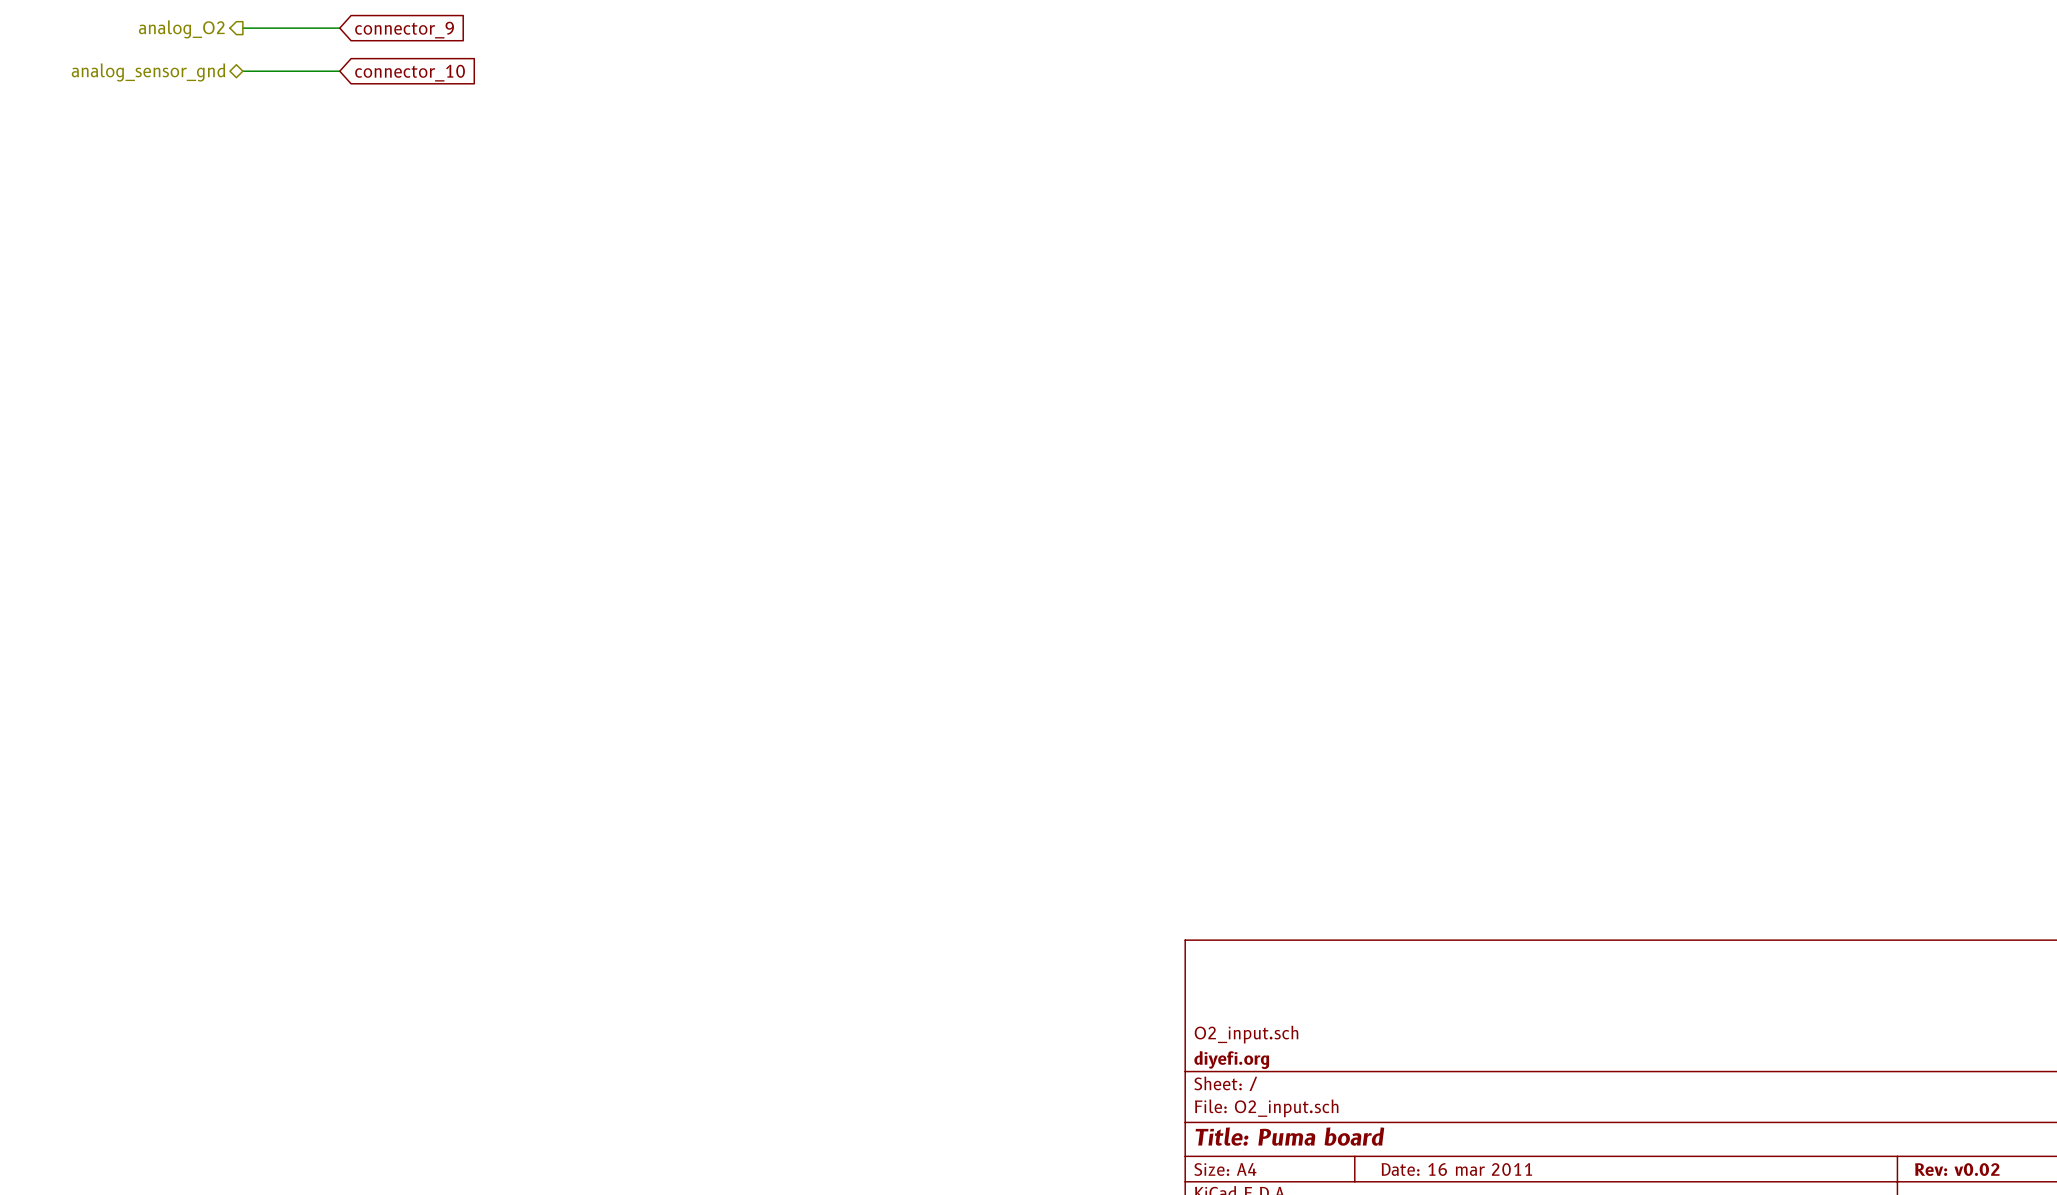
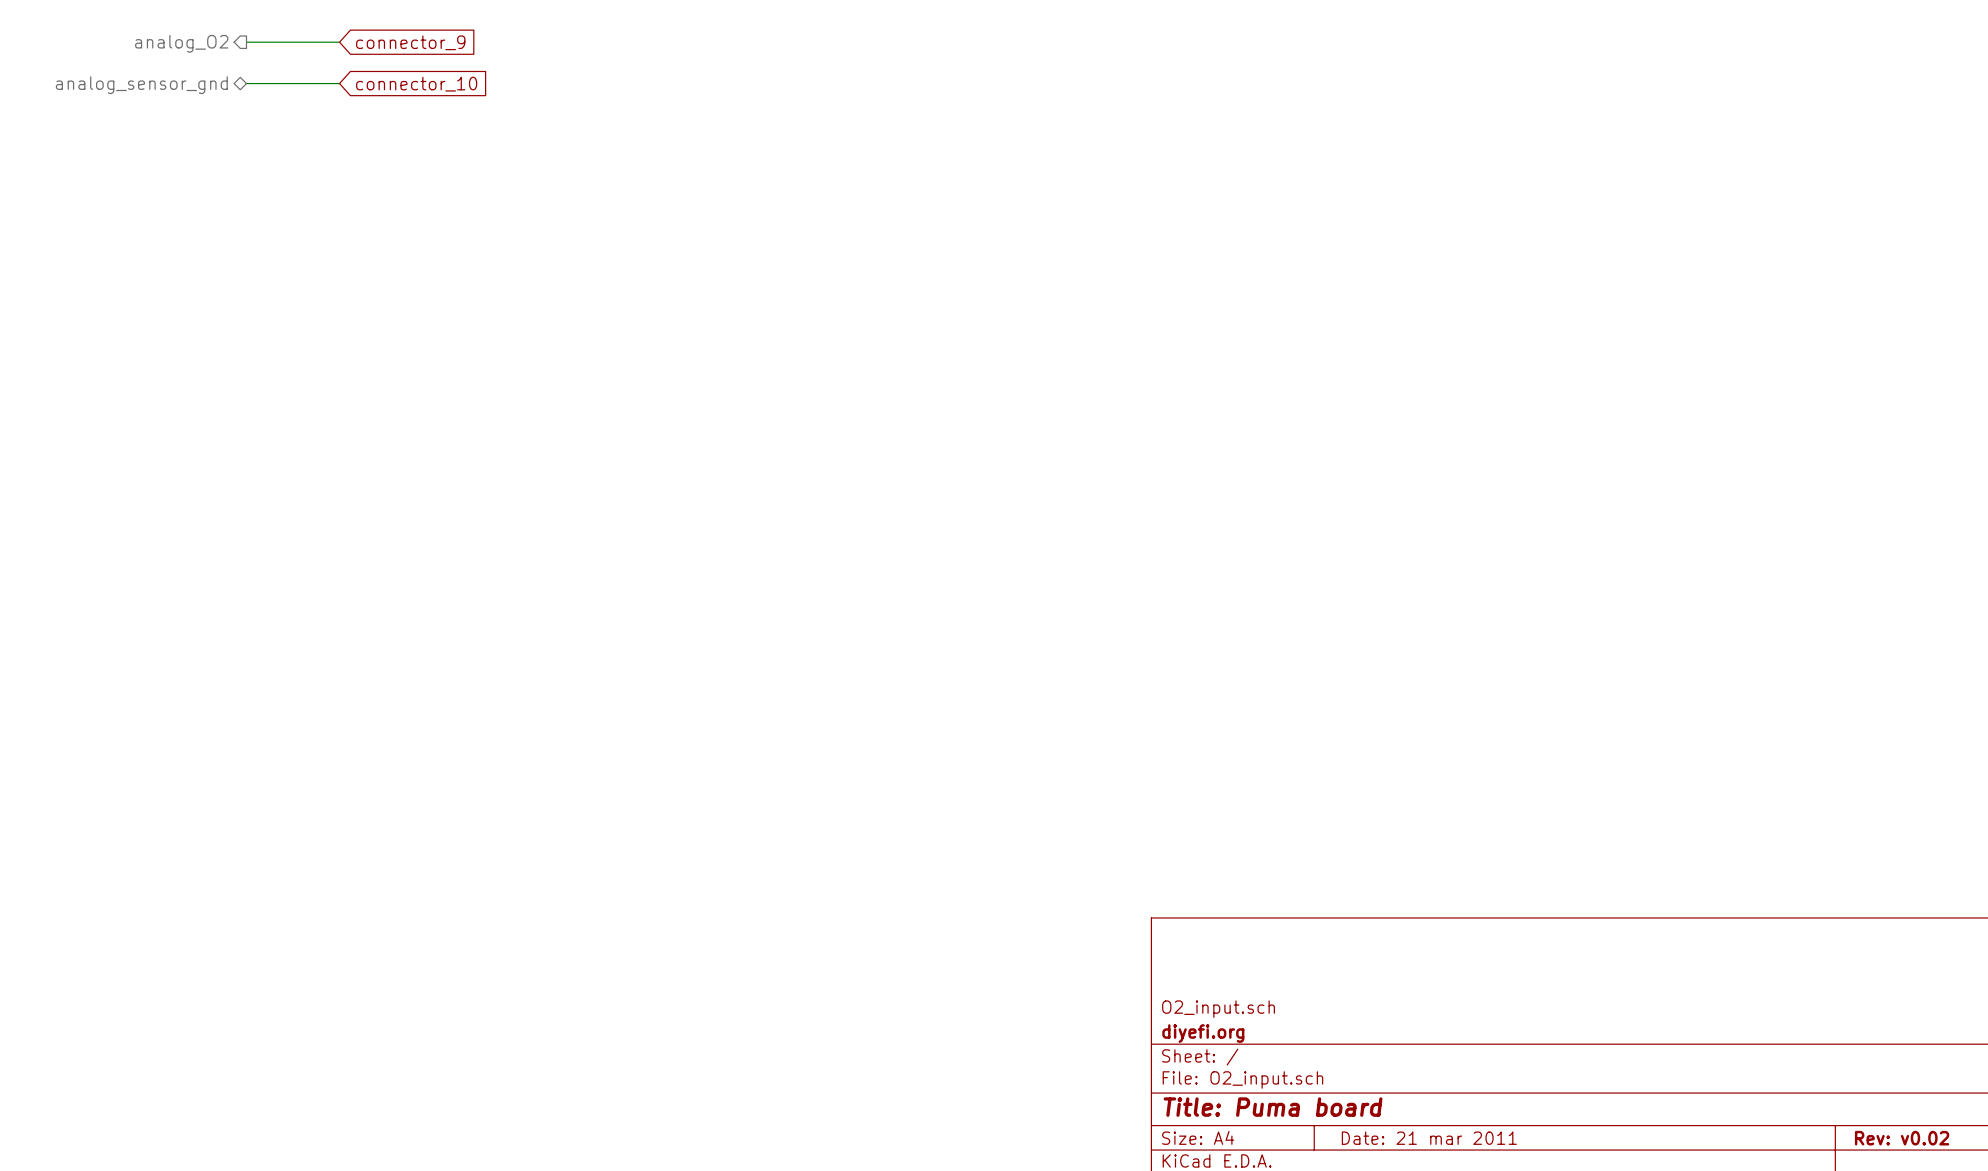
title block: Date: 16 mar 2011 (1456, 1169) -> Date: 21 mar 2011 (1429, 1138)

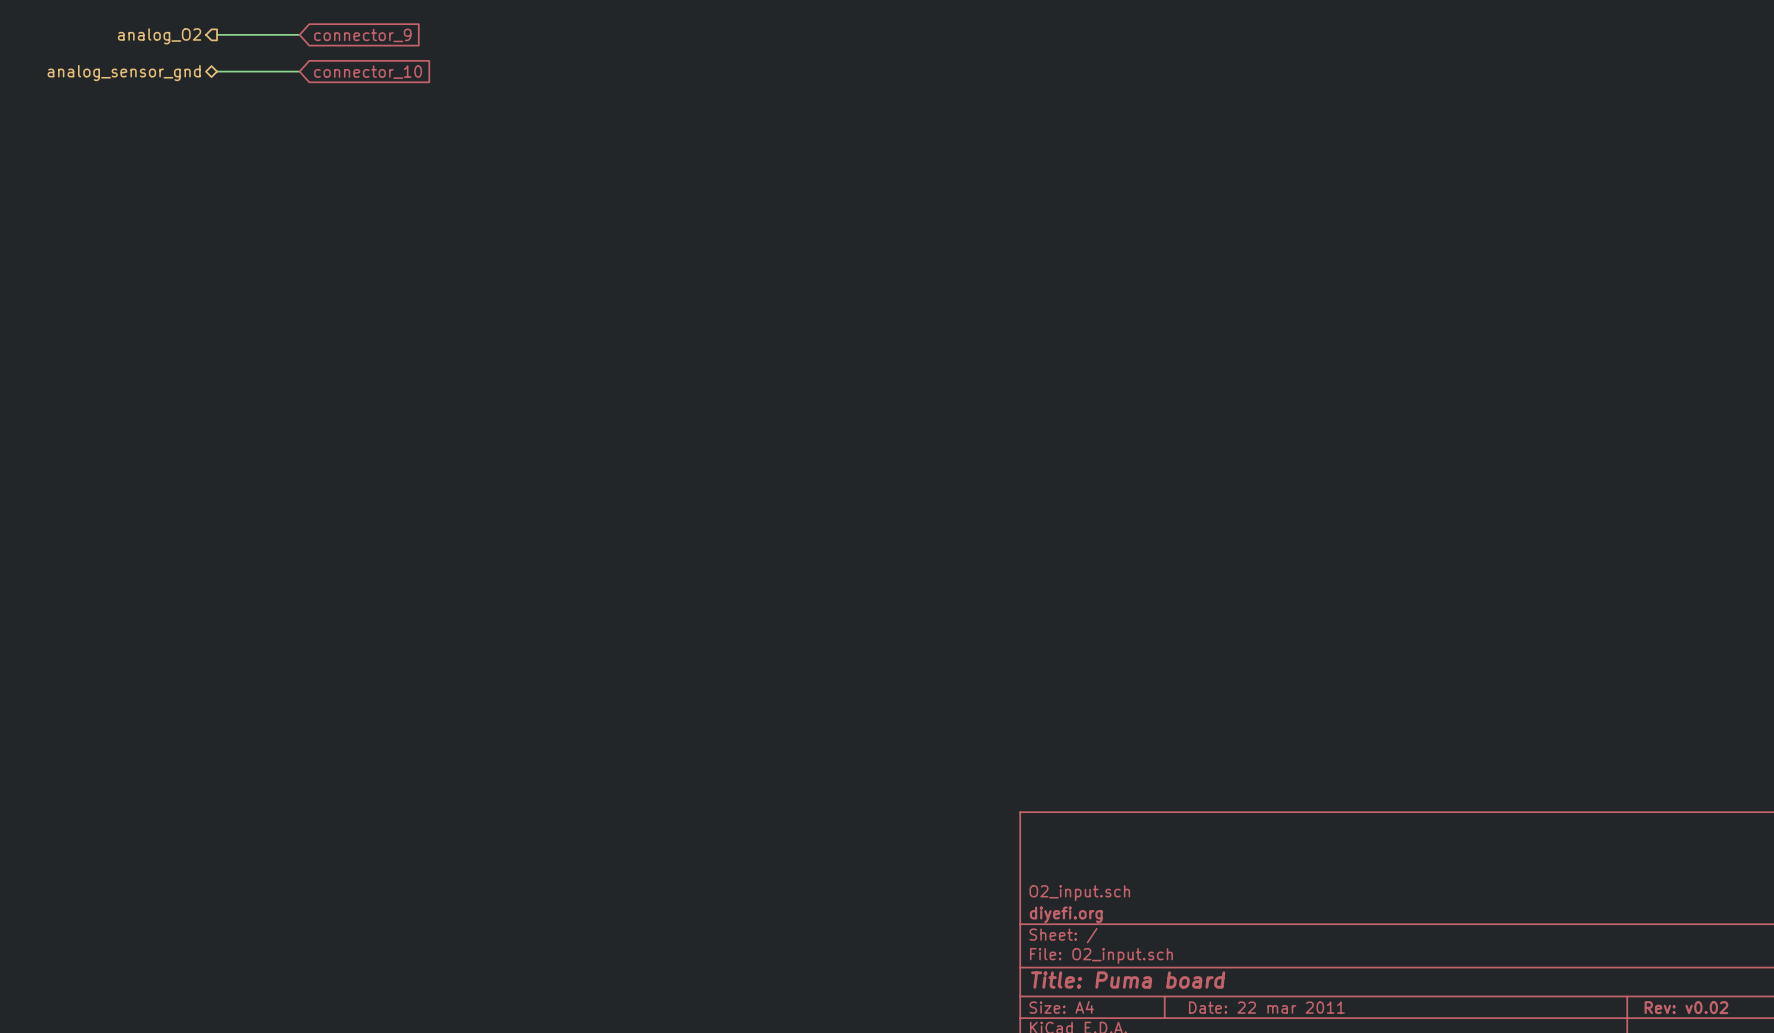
title block: Date: 21 mar 2011 (1429, 1138) -> Date: 22 mar 2011 (1266, 1007)

